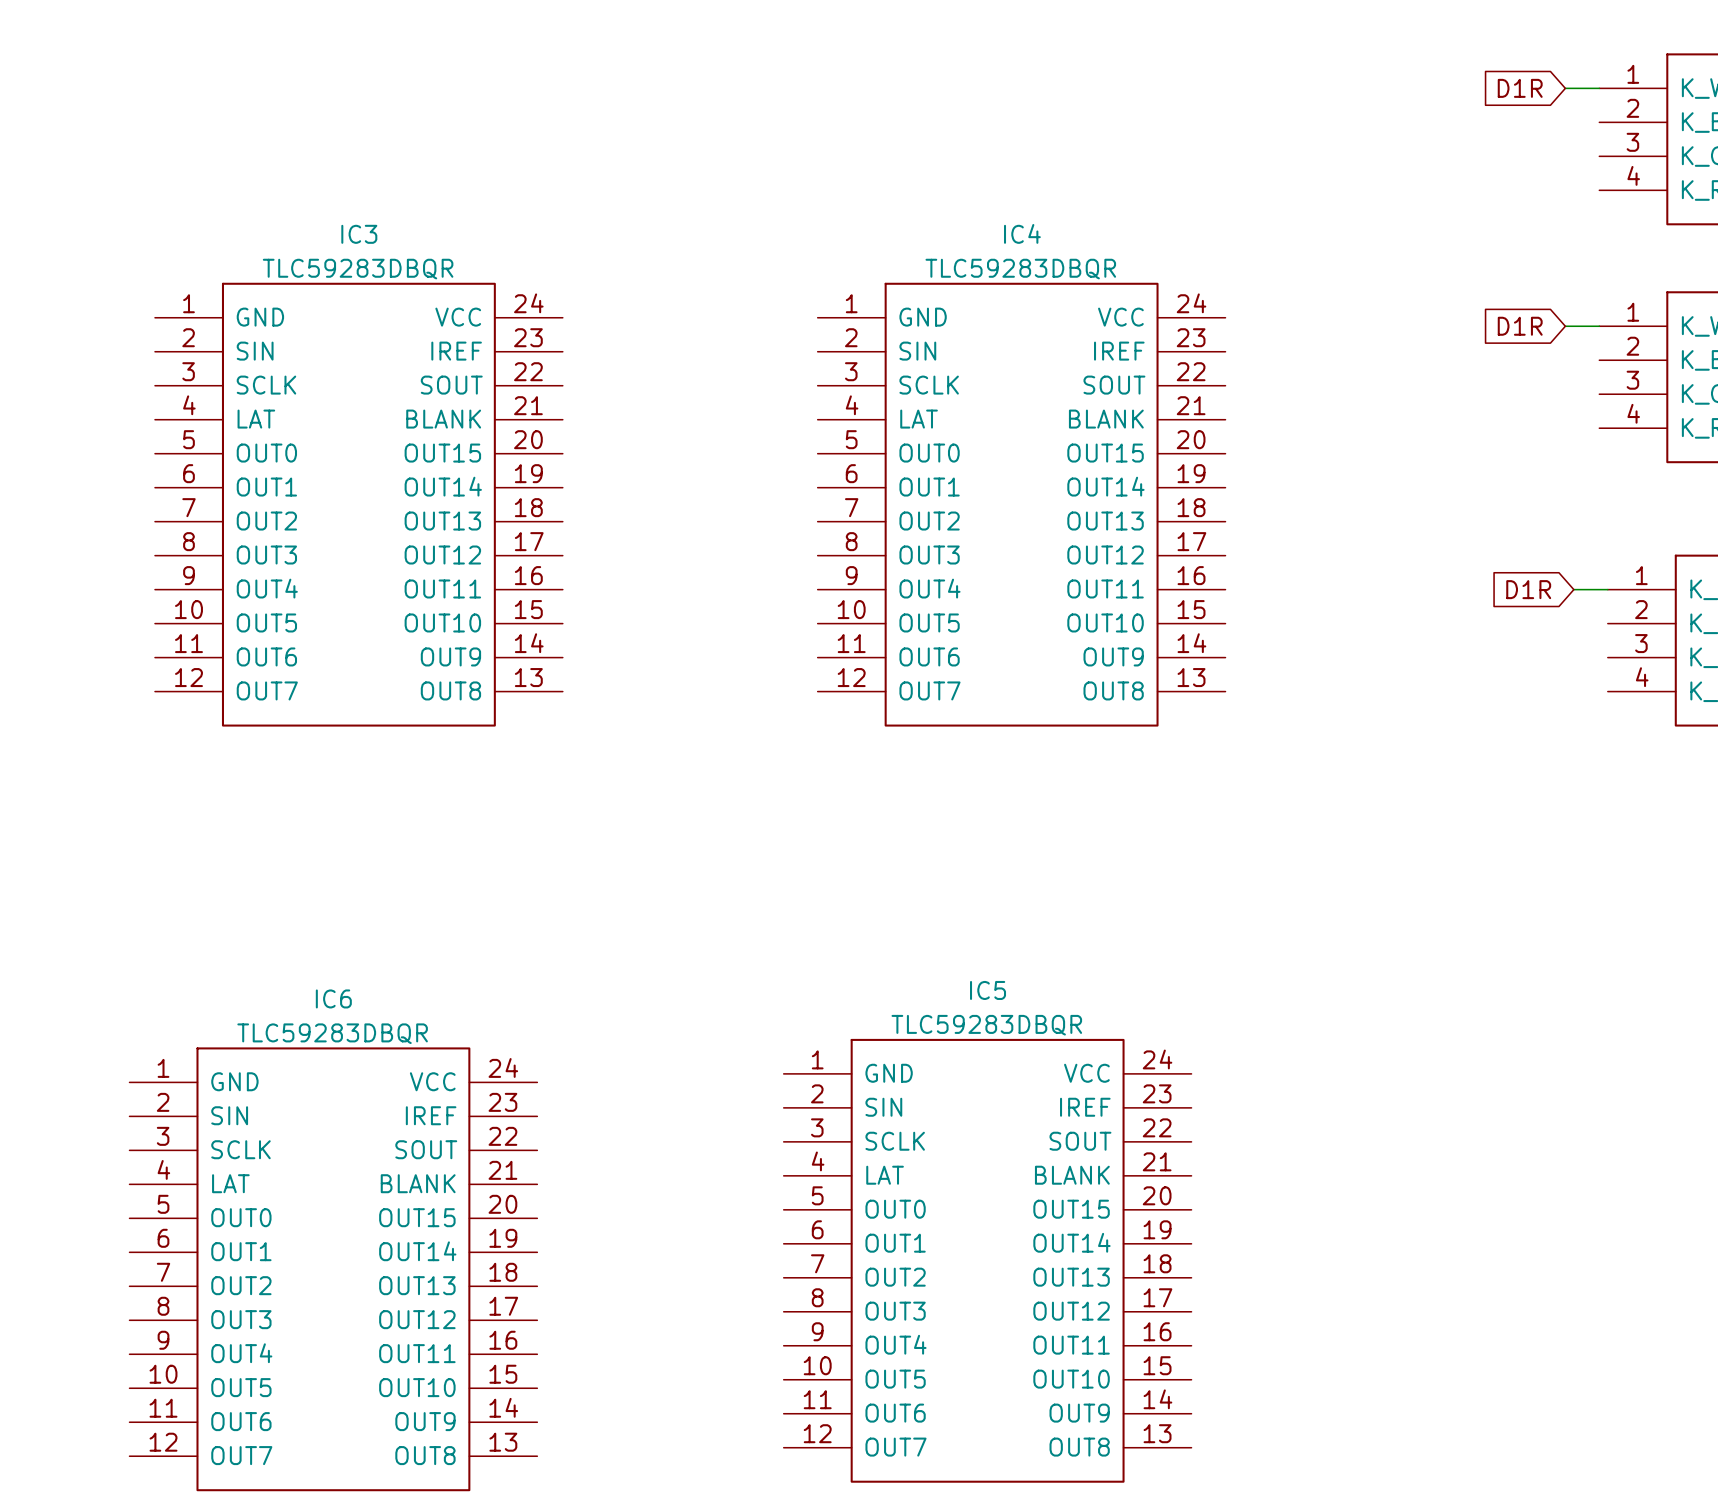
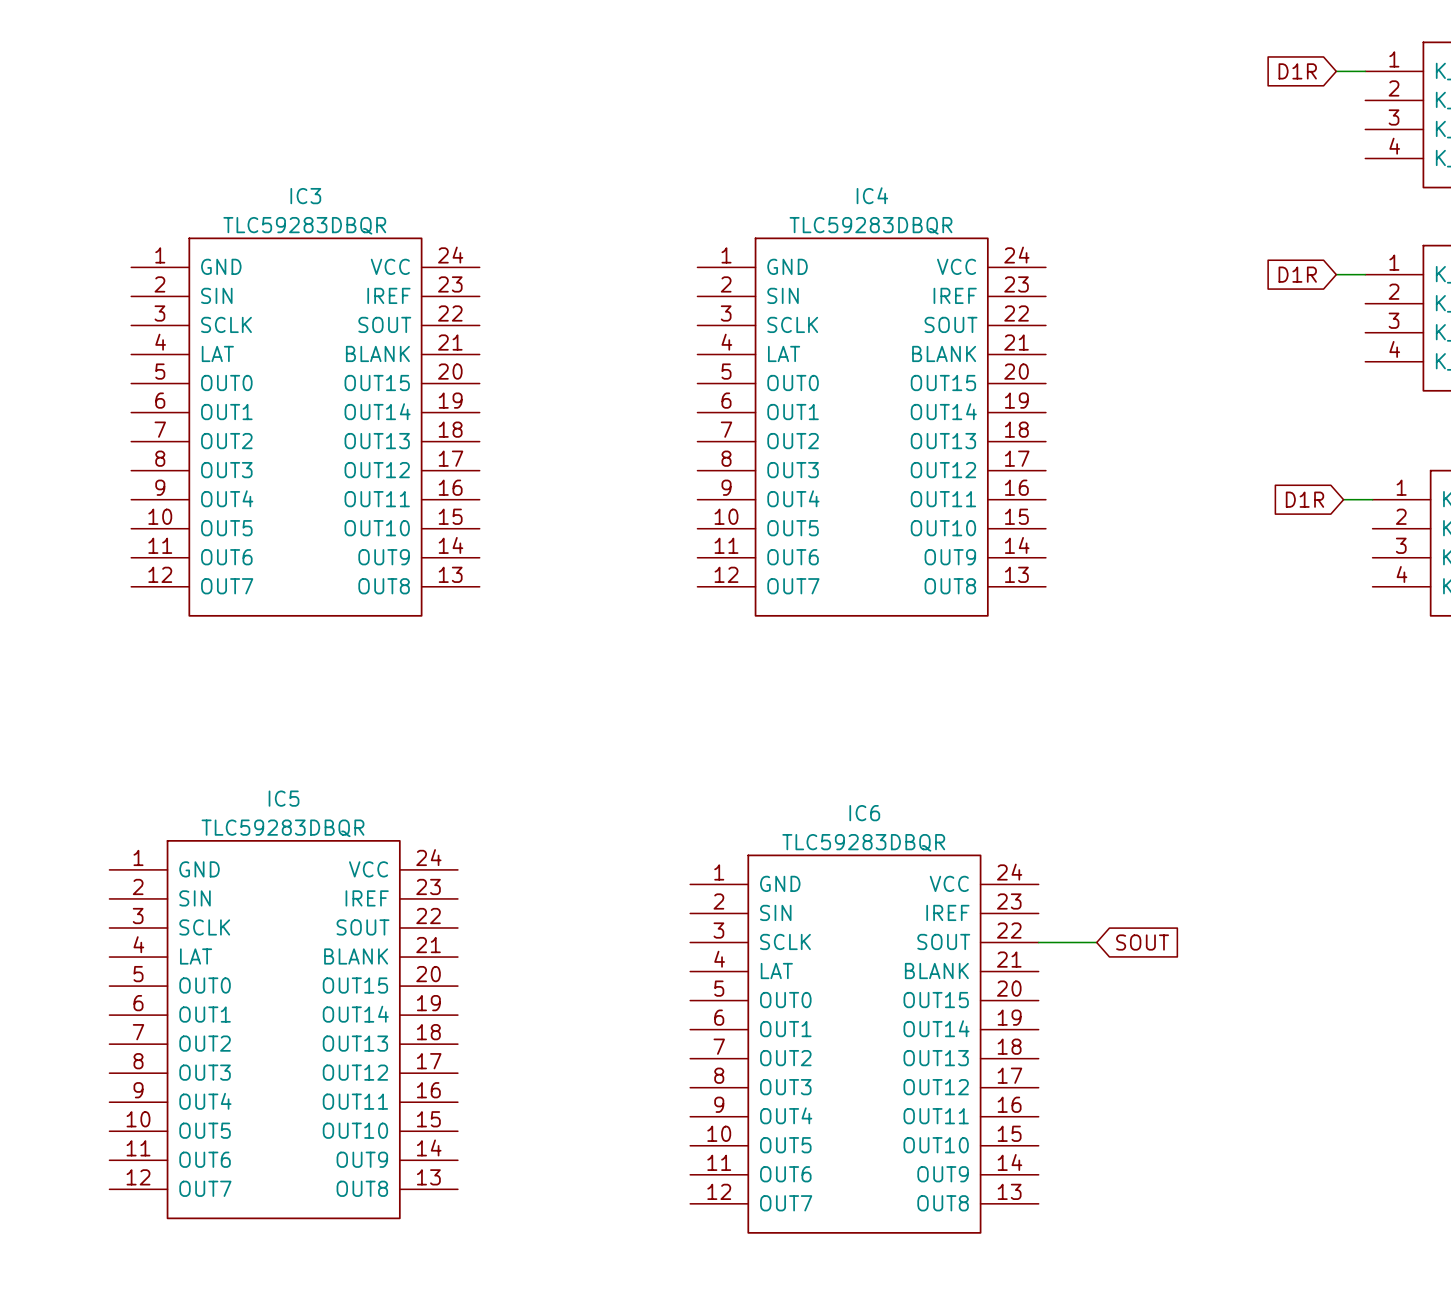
wire: none -> (1038, 942) (1096, 942)
global label: none -> SOUT (1142, 942)
IC5 position: (987, 1260) -> (283, 1029)
IC6 position: (333, 1269) -> (864, 1044)

